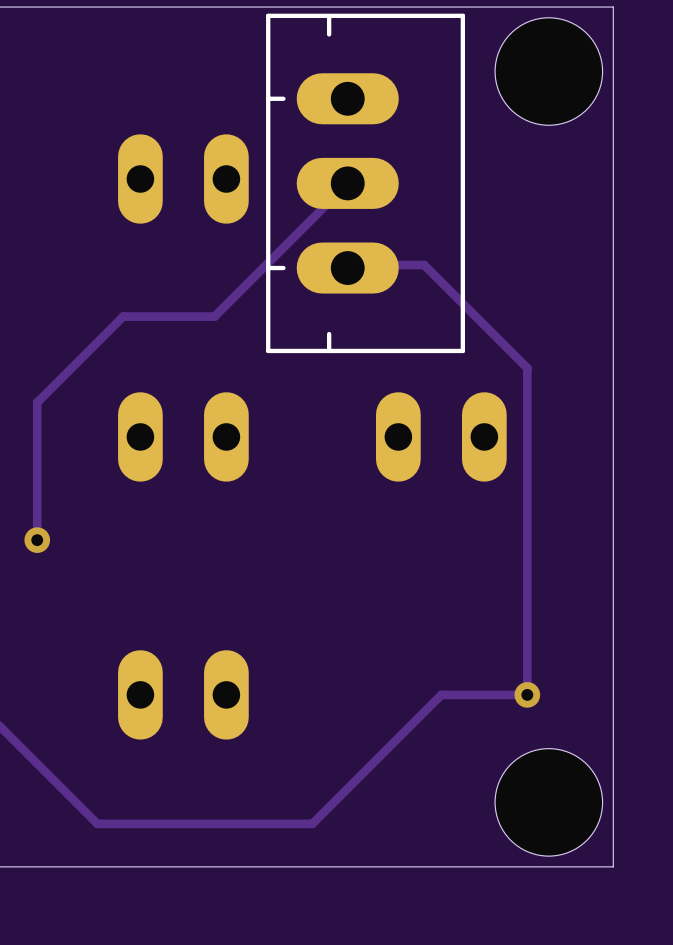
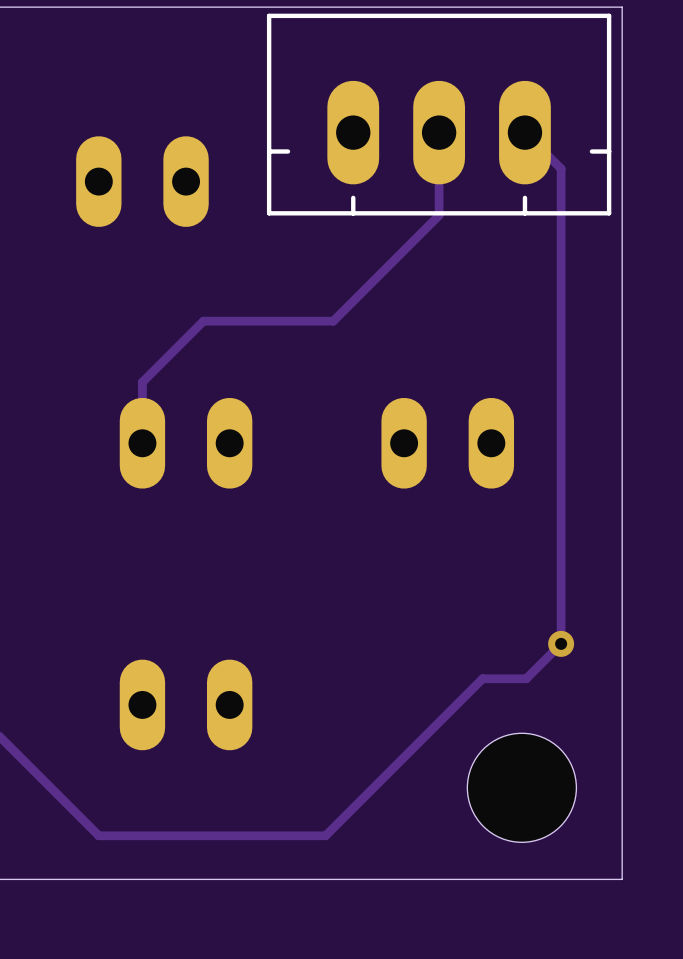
hole: (548, 71) -> none
part position: (183, 179) -> (142, 181)
track: (347, 183) (214, 316) -> (439, 132) (439, 215) (333, 321) (217, 321)
part rotation: 0° (365, 183) -> 90° counterclockwise (439, 114)
track: (347, 268) (350, 264) (424, 264) (527, 368) (527, 694) (441, 694) (312, 823) -> (524, 132) (561, 168) (561, 643) (526, 678) (482, 678) (325, 835) (316, 835)
track: (200, 316) (123, 316) (37, 402) (37, 540) -> (203, 321) (142, 382) (142, 443)
via: (37, 540) -> none
via position: (527, 694) -> (561, 643)
hole position: (548, 802) -> (521, 787)

